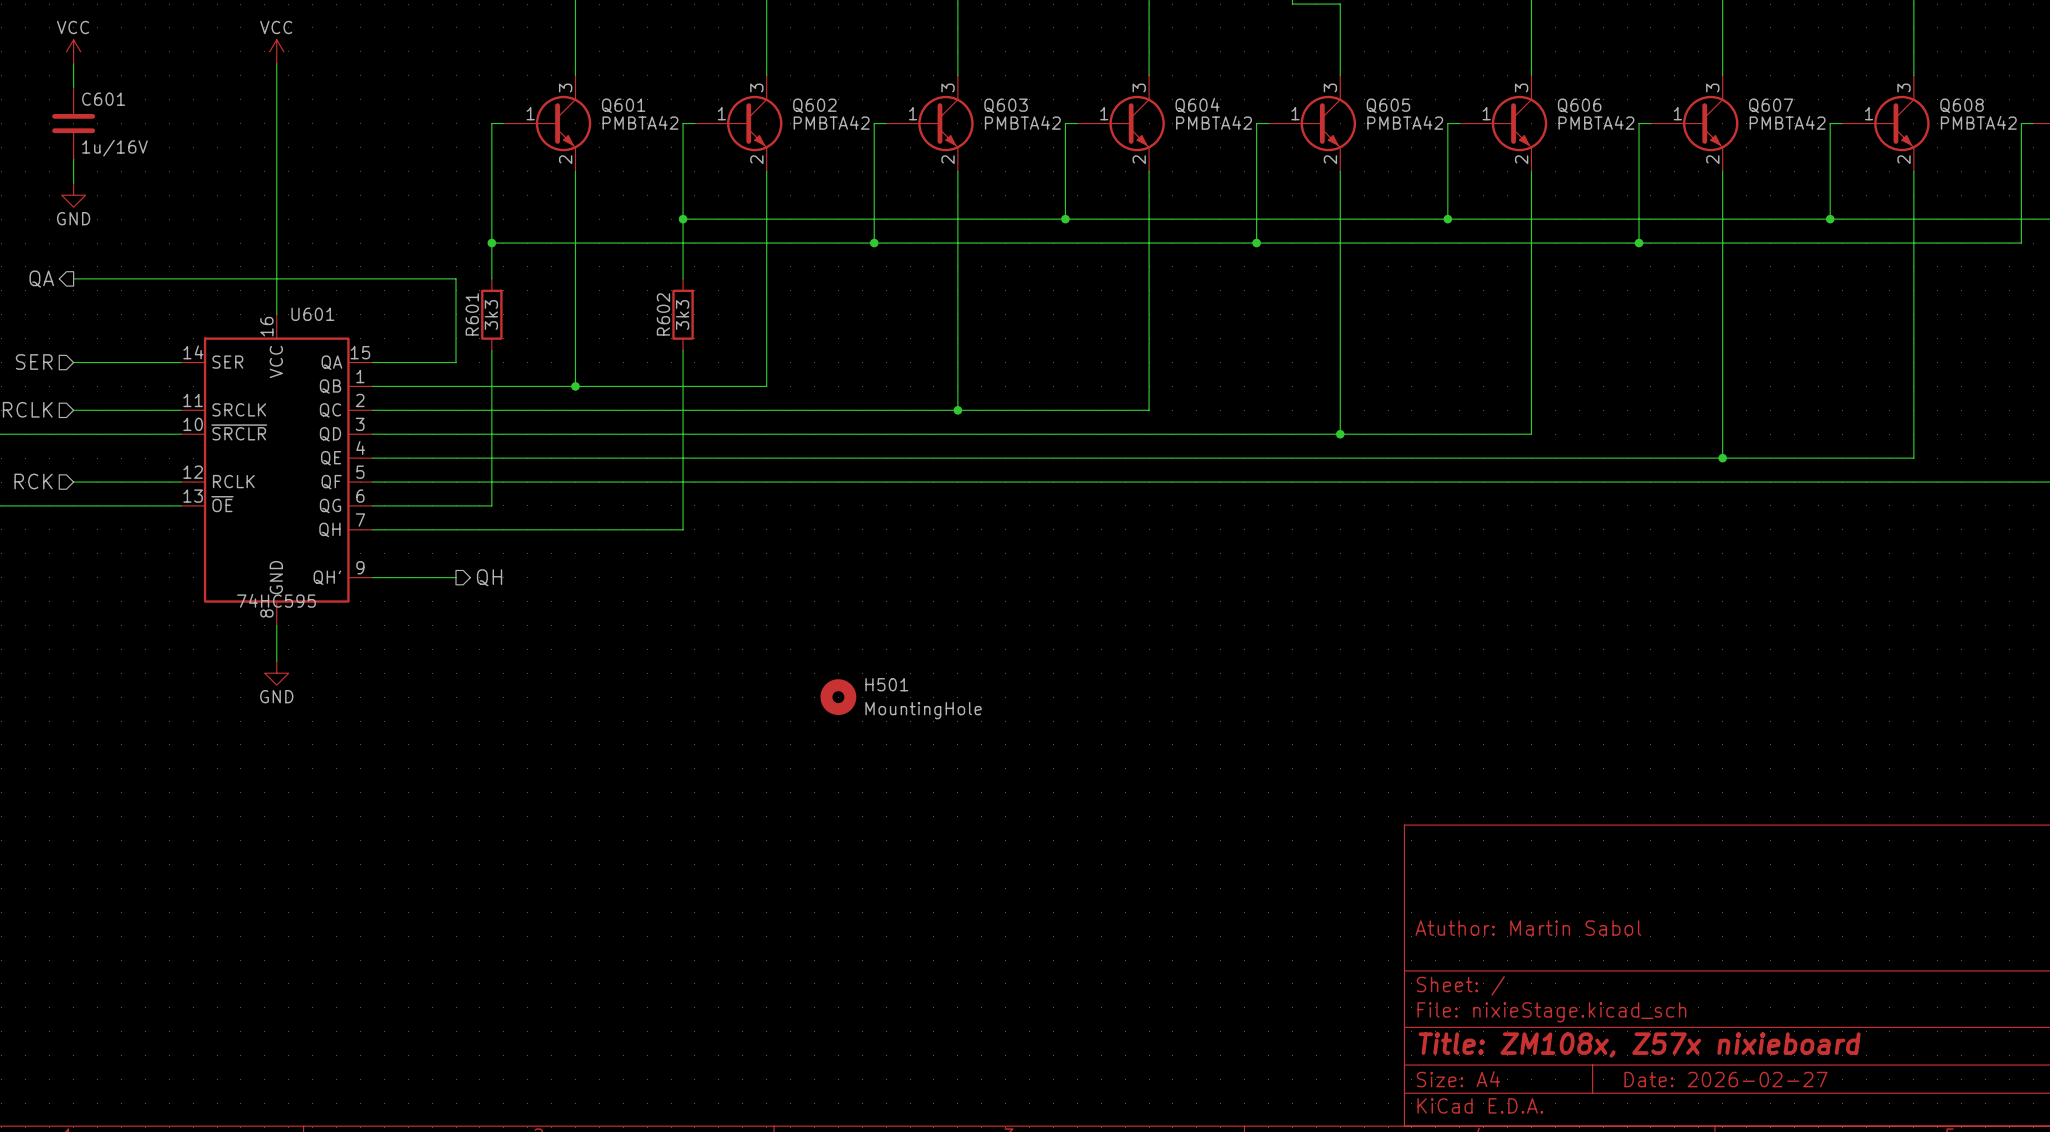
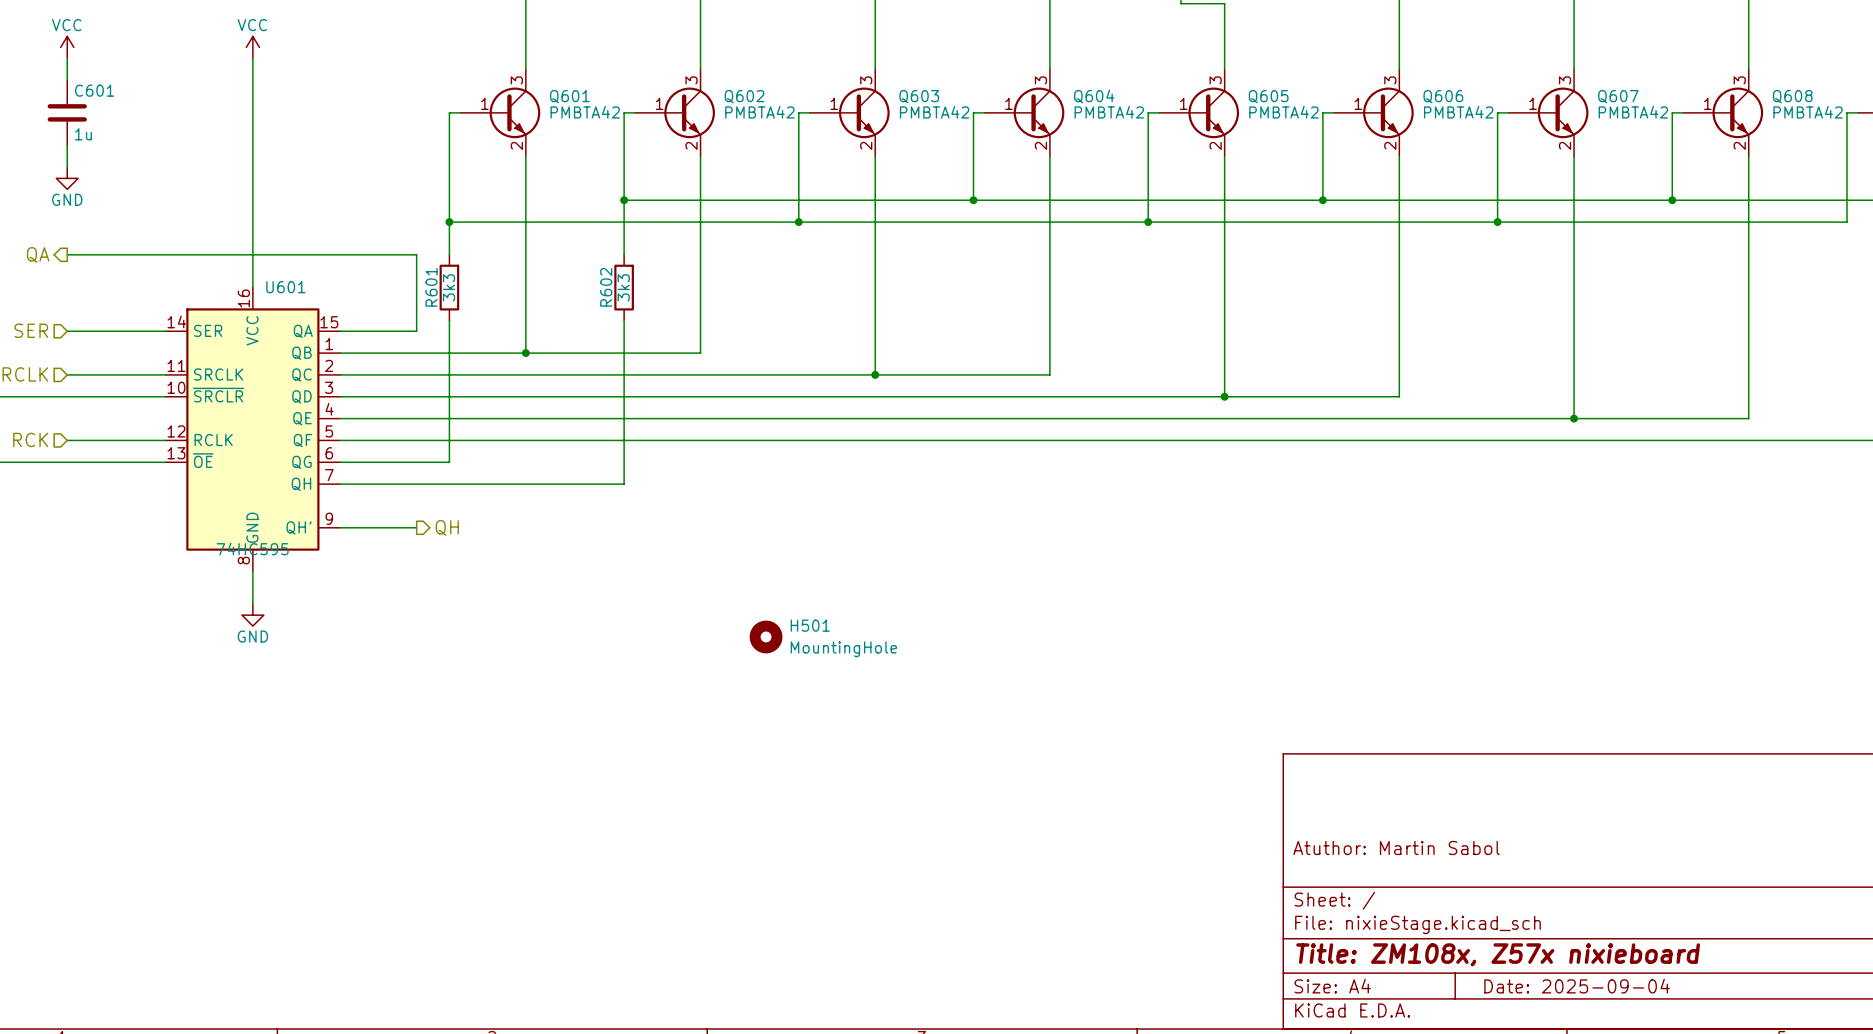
C601 value: 1u/16V (114, 148) -> 1u (83, 134)
title block: Date: 2026-02-27 (1725, 1079) -> Date: 2025-09-04 (1577, 986)

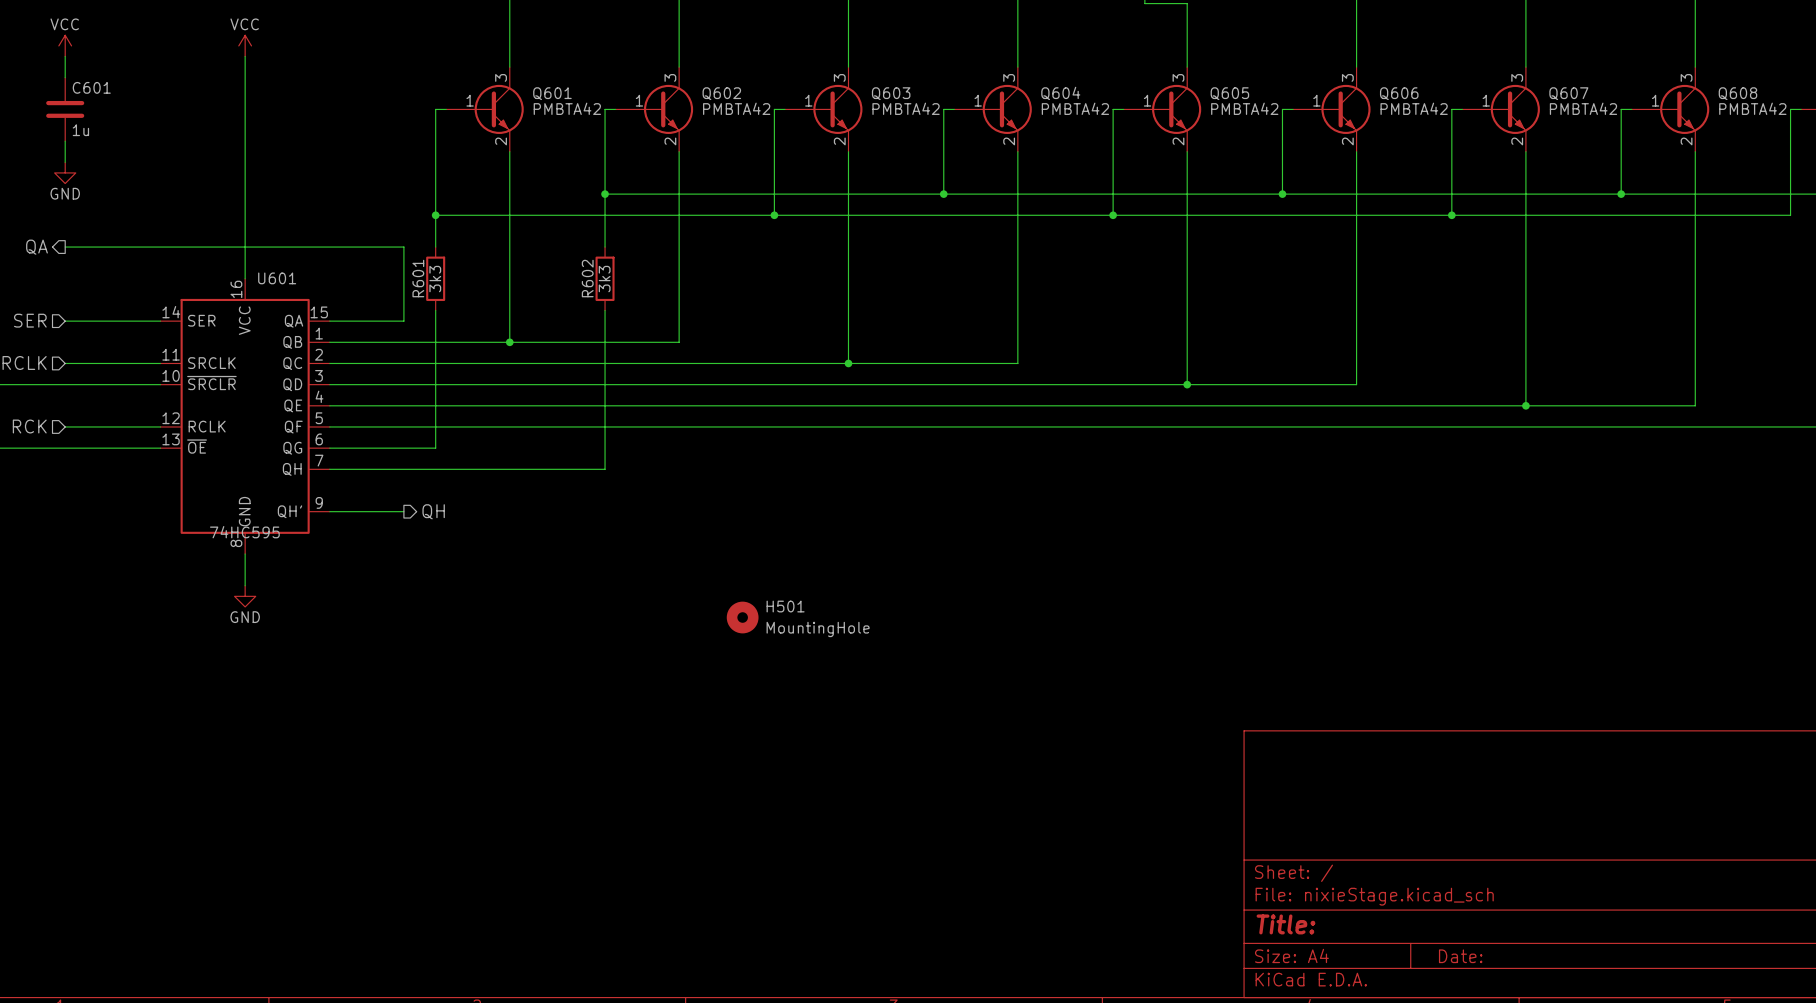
title block: Atuthor: Martin Sabol (1396, 847) -> none
title block: Title: ZM108x, Z57x nixieboard (1498, 954) -> Title: (1285, 924)
title block: Date: 2025-09-04 (1577, 986) -> Date: (1460, 956)

